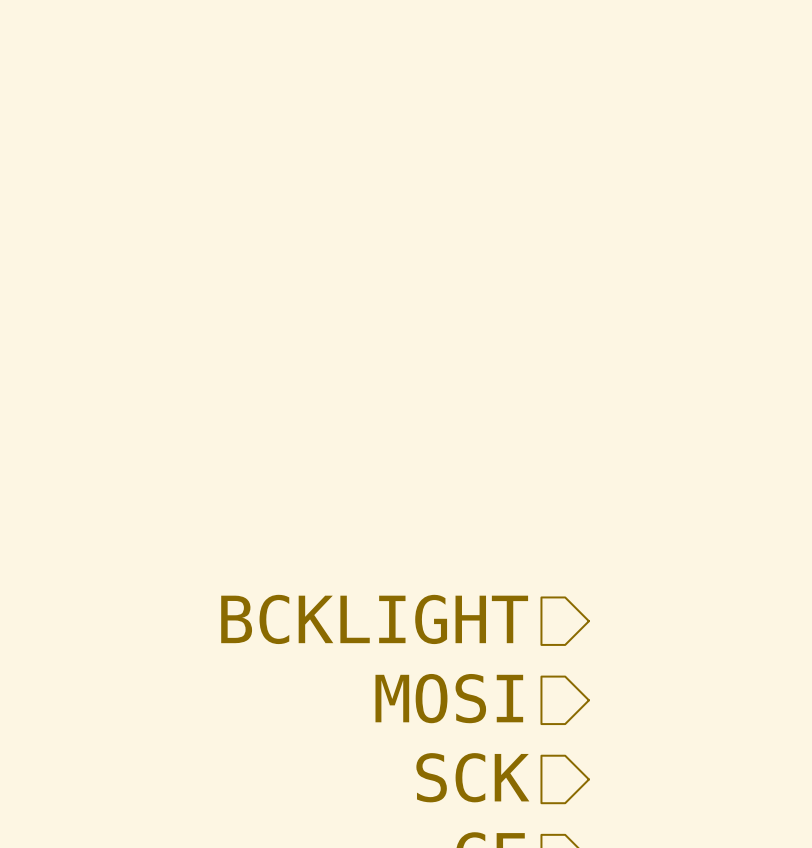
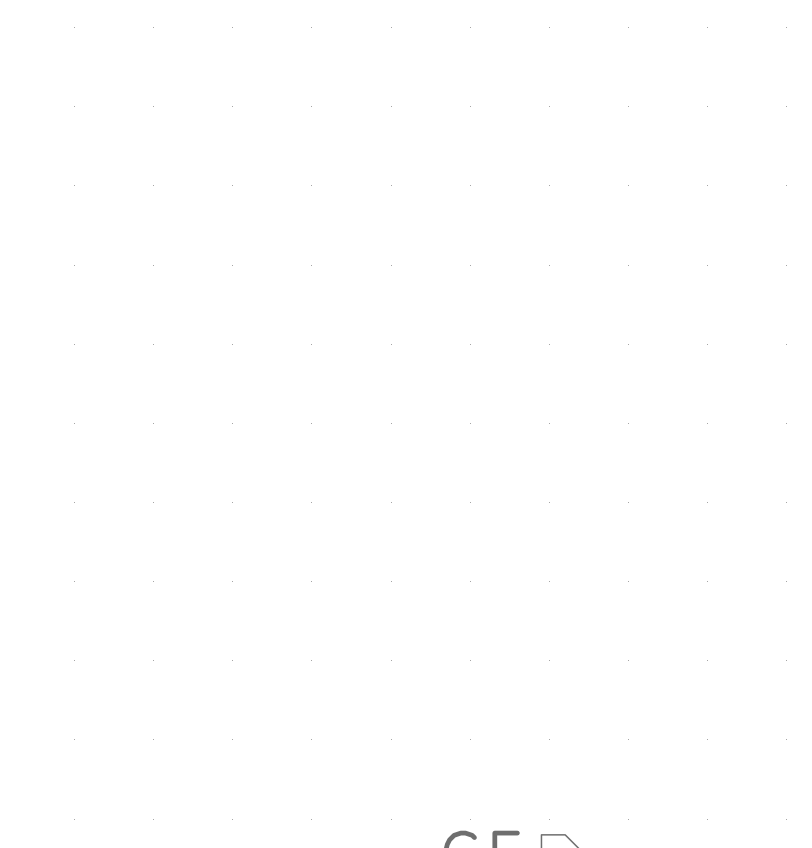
hierarchical label: BCKLIGHT (374, 619) -> none
hierarchical label: MOSI (449, 698) -> none
hierarchical label: SCK (472, 777) -> none

